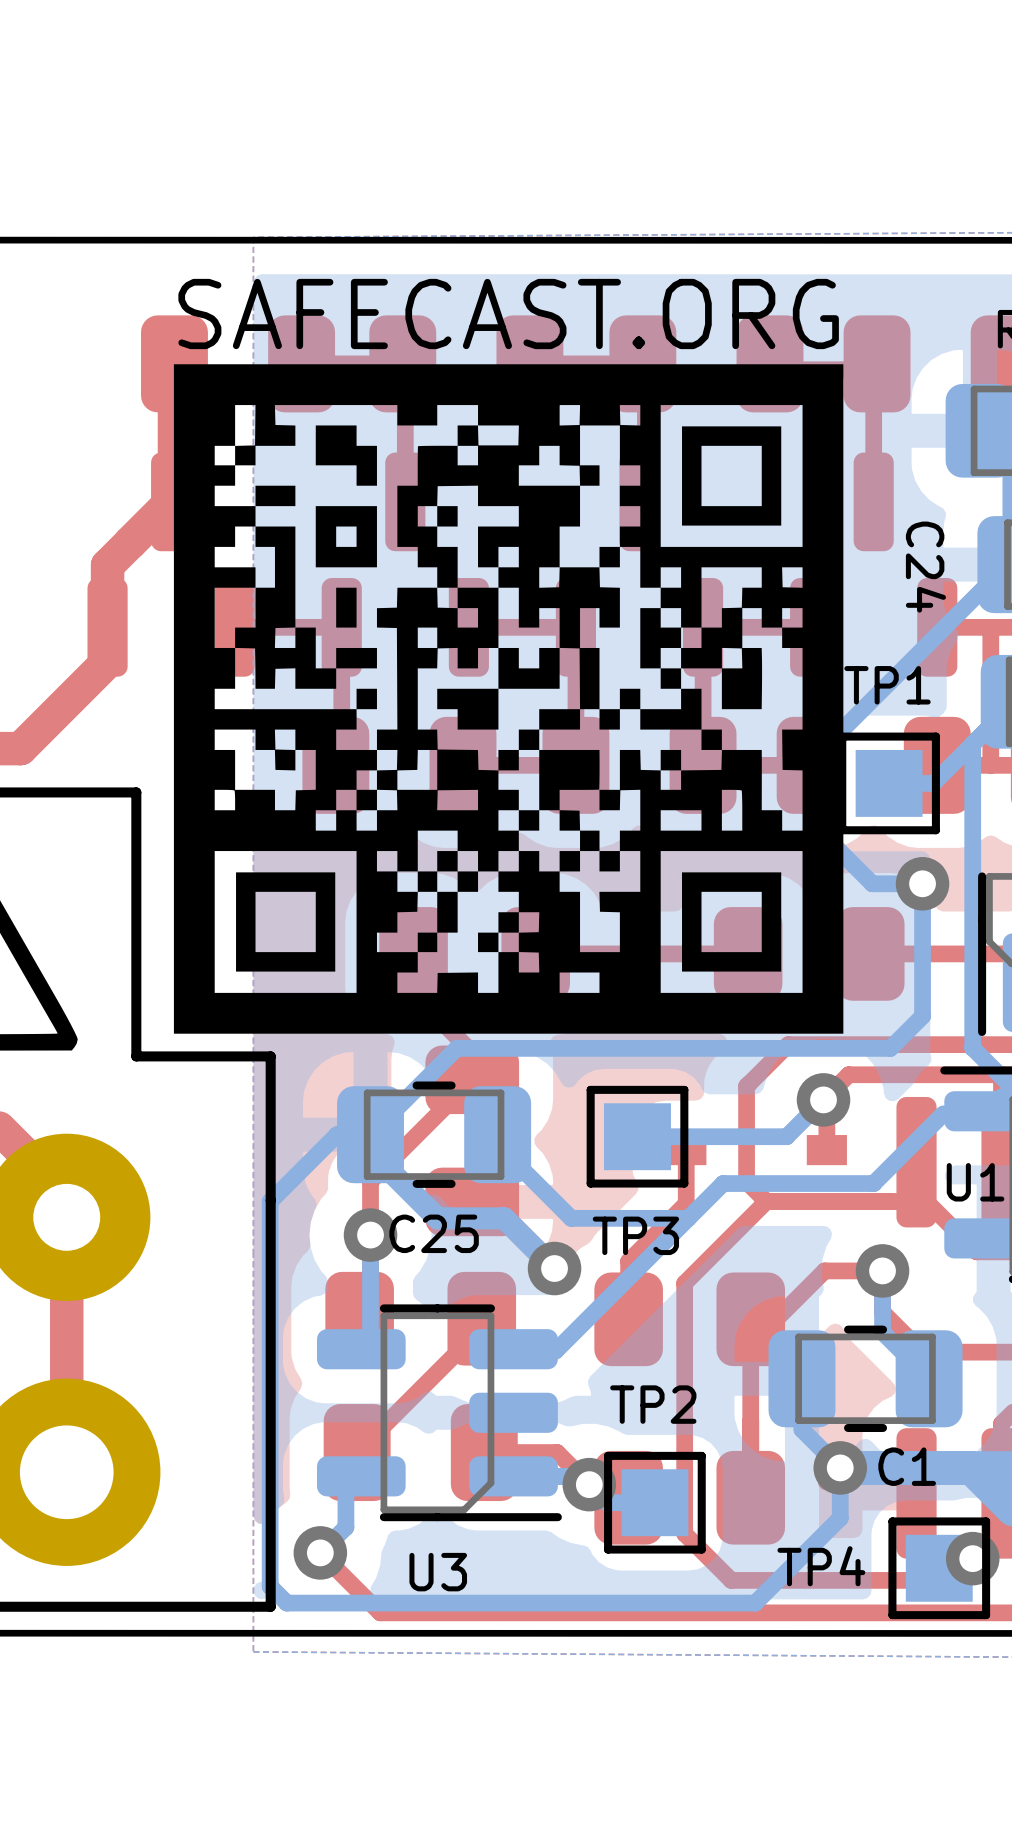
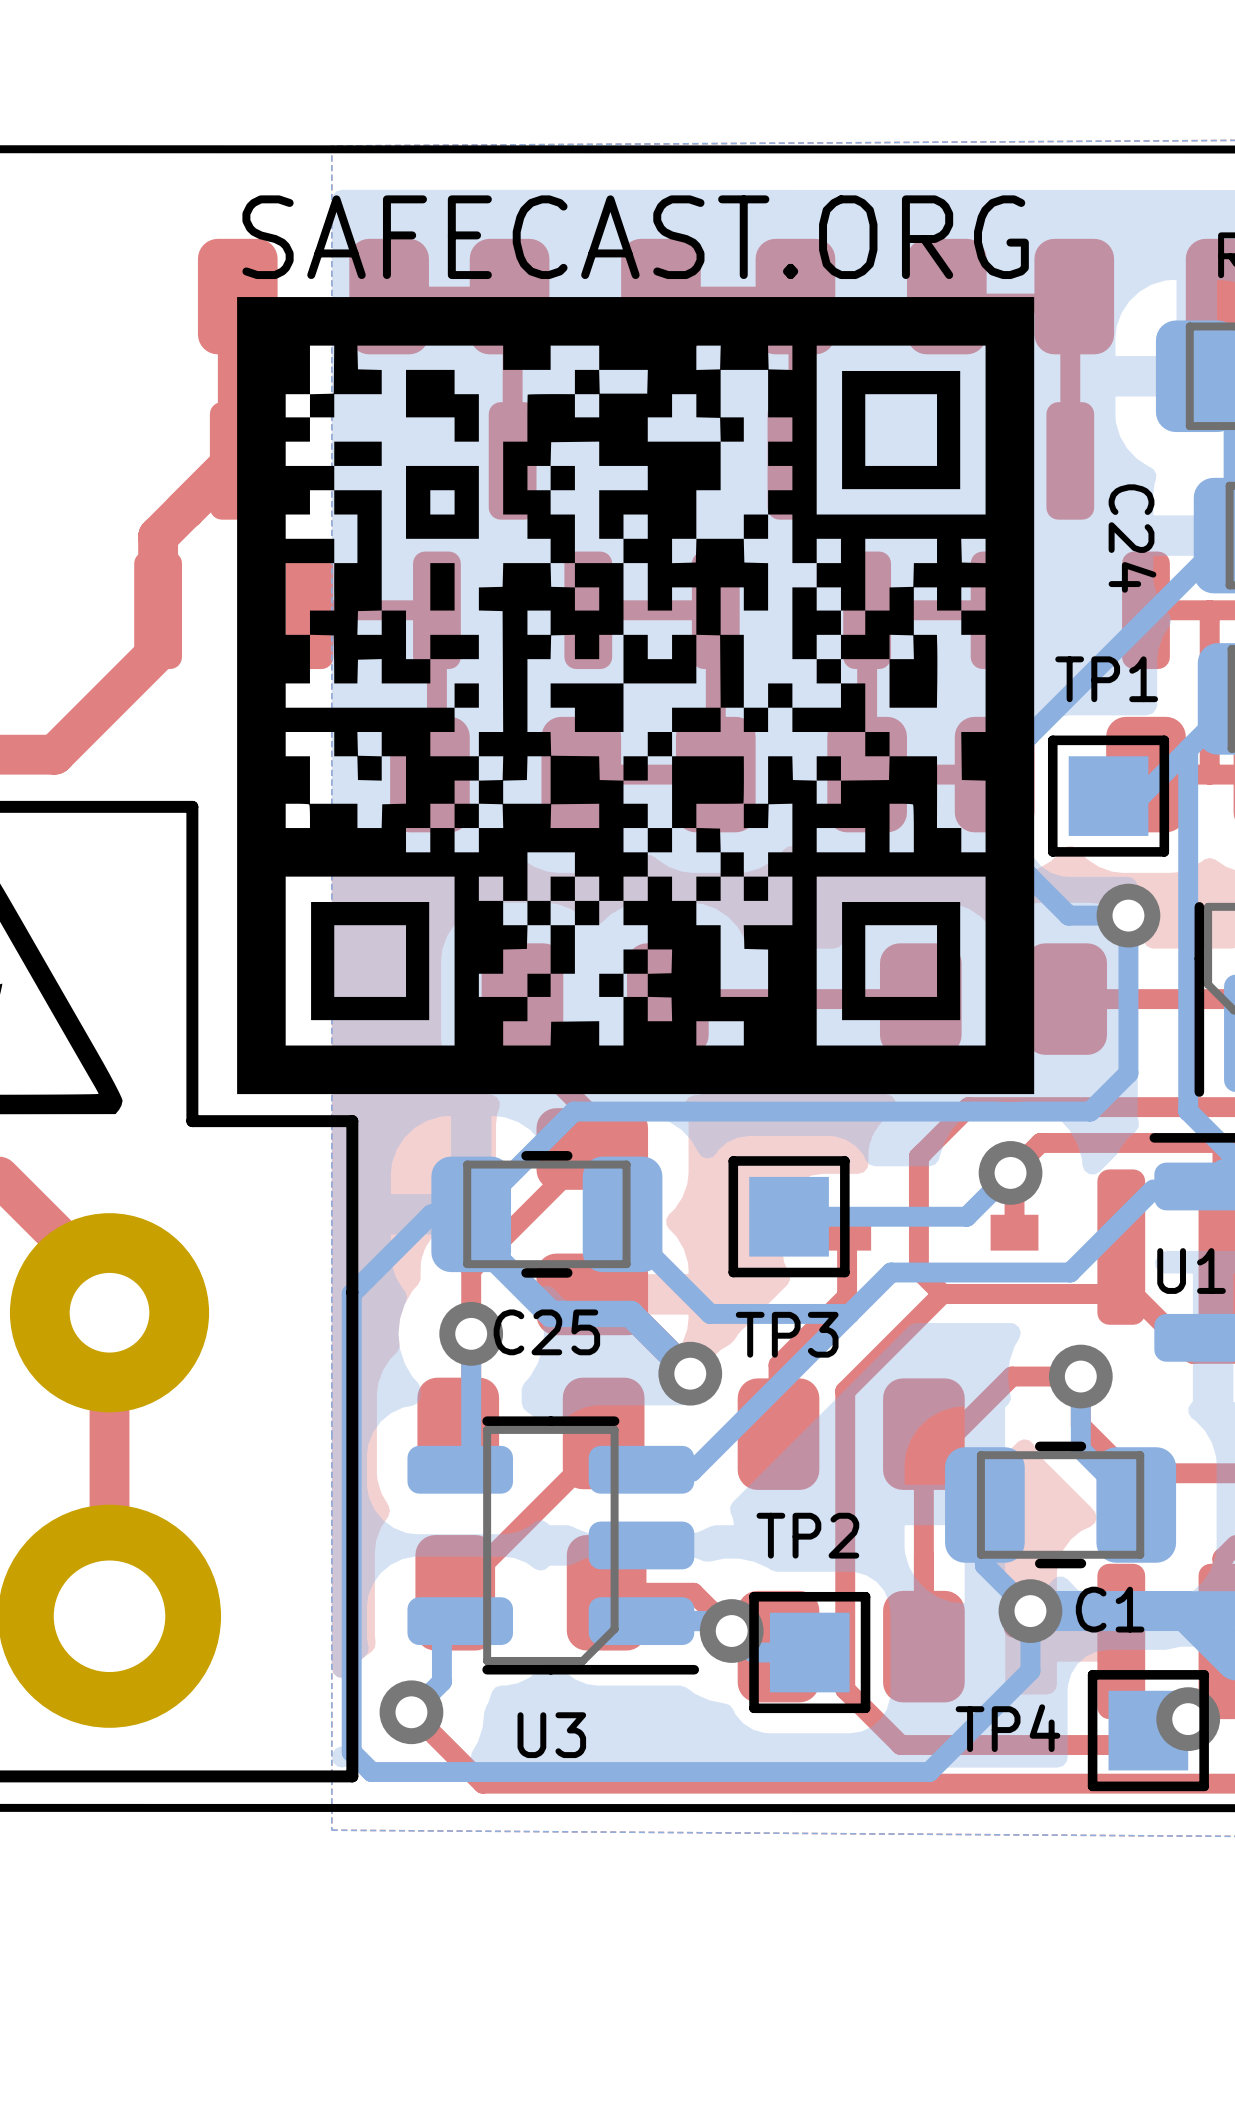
TP1 position: (889, 783) -> (1108, 796)

